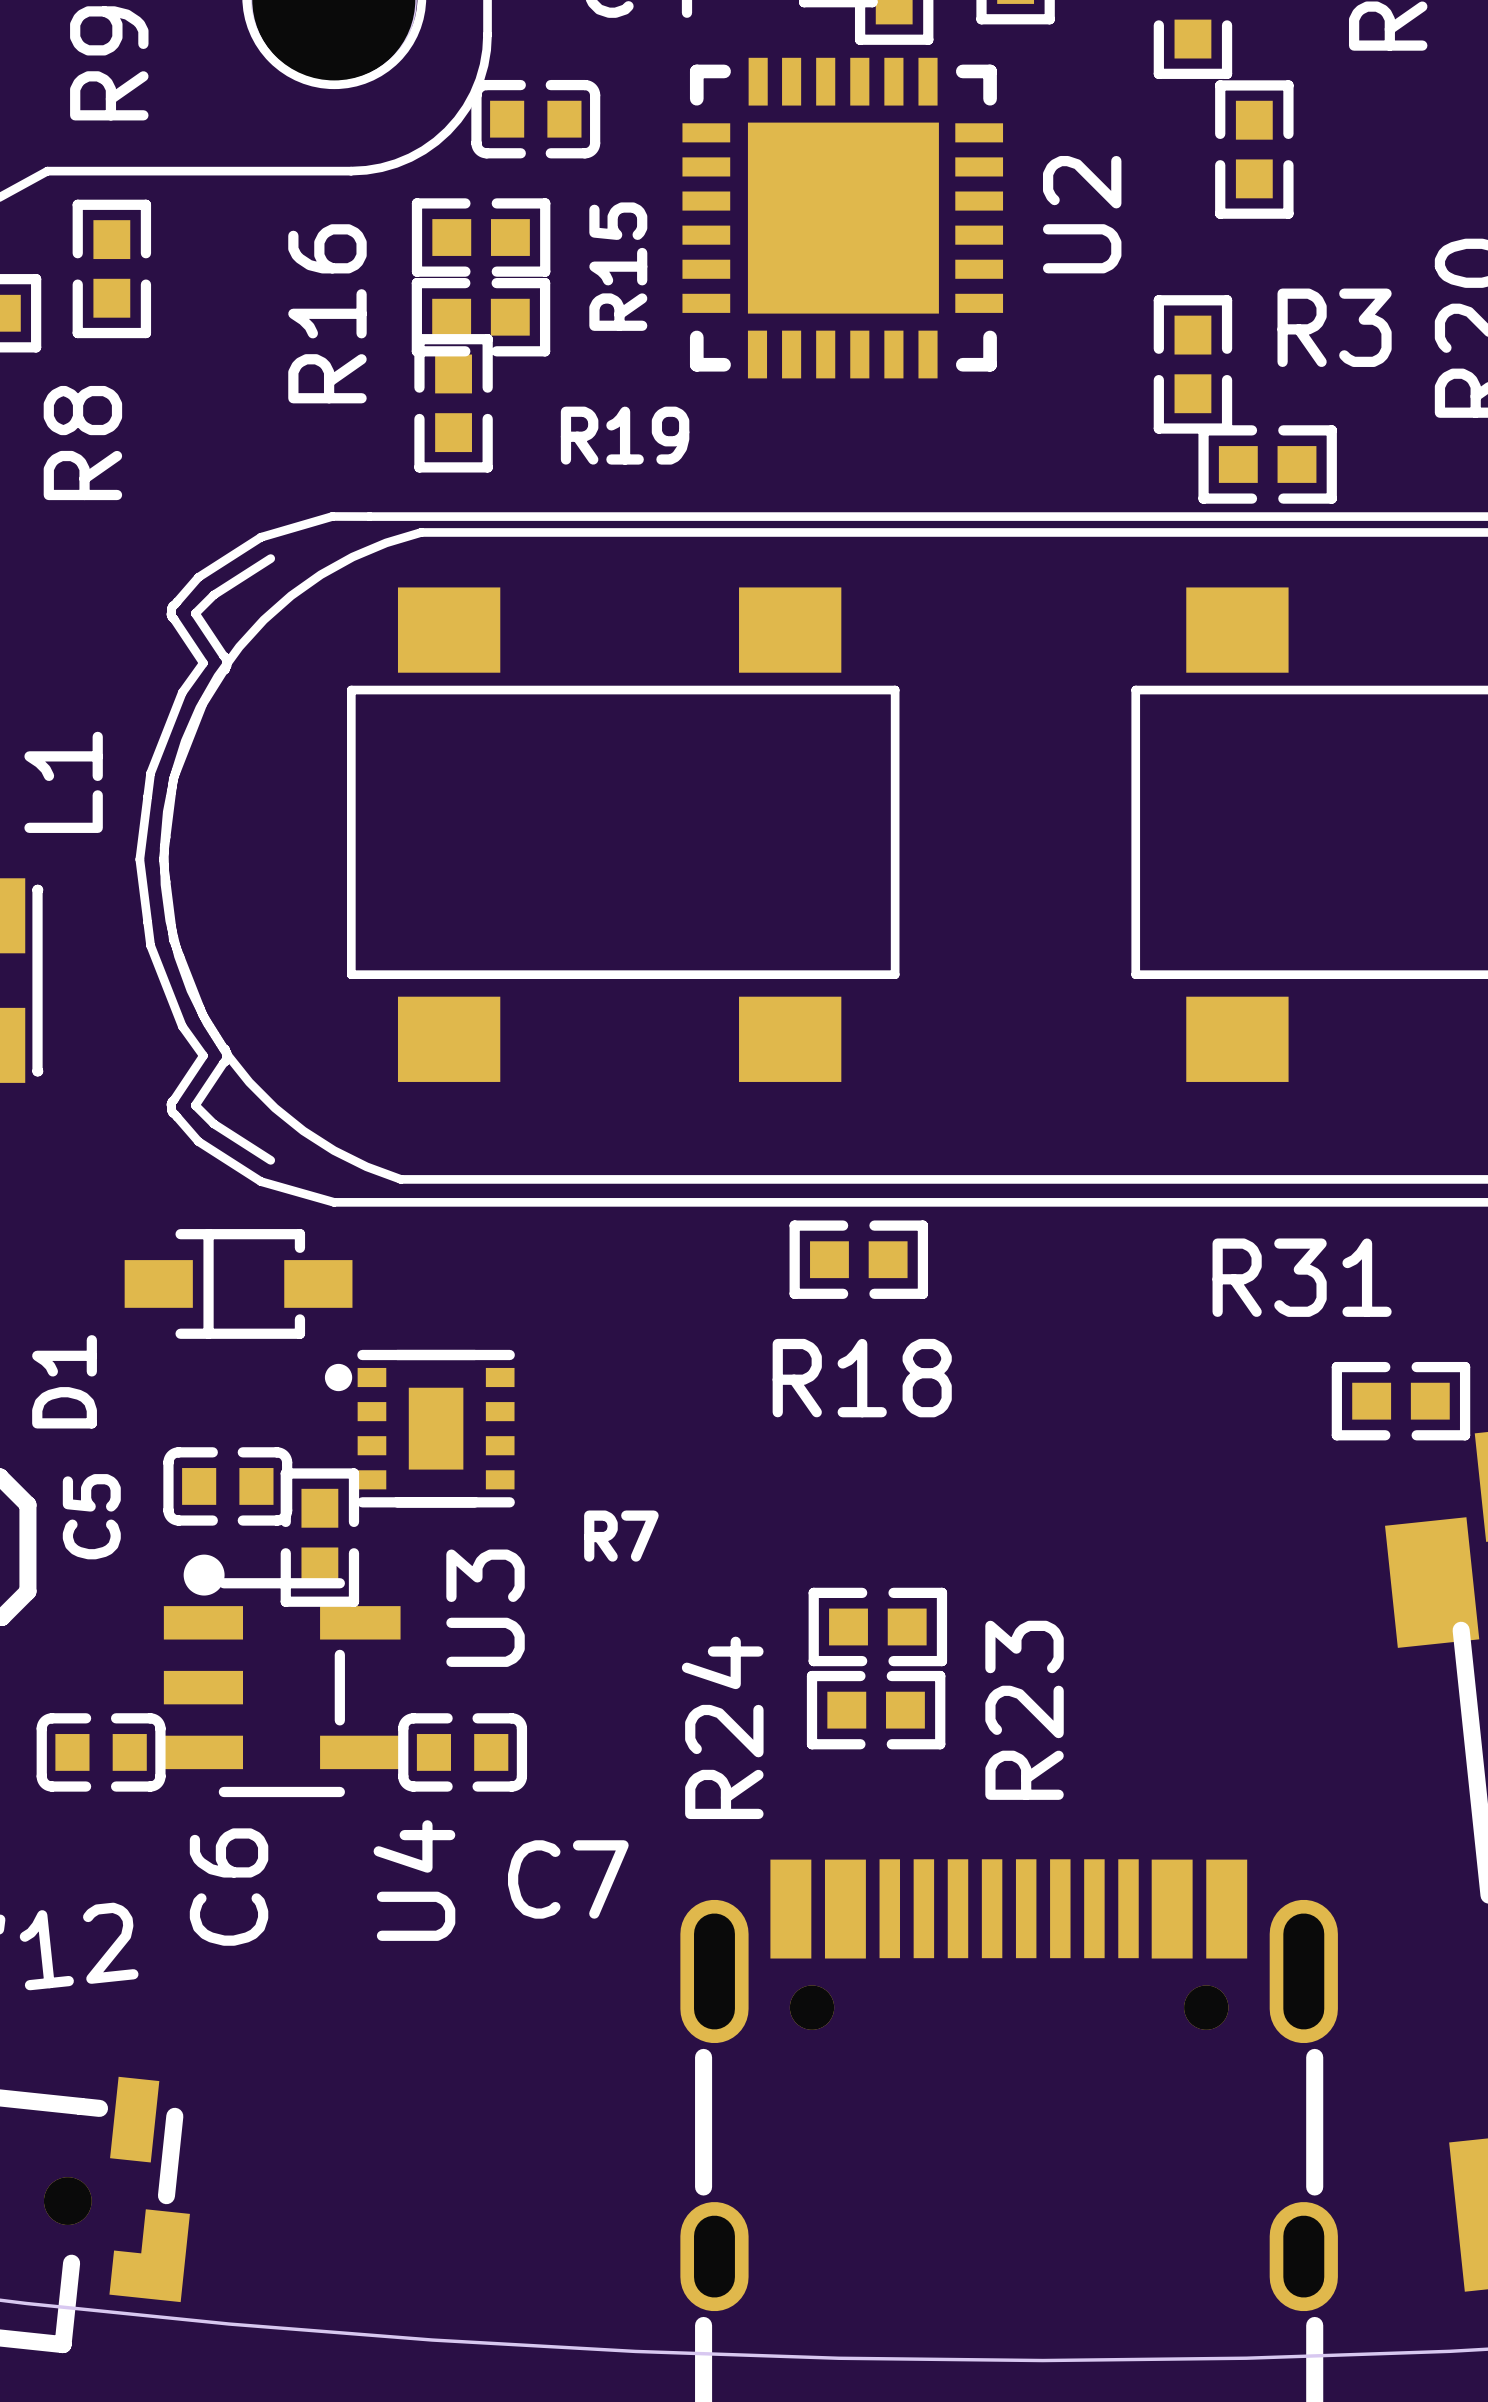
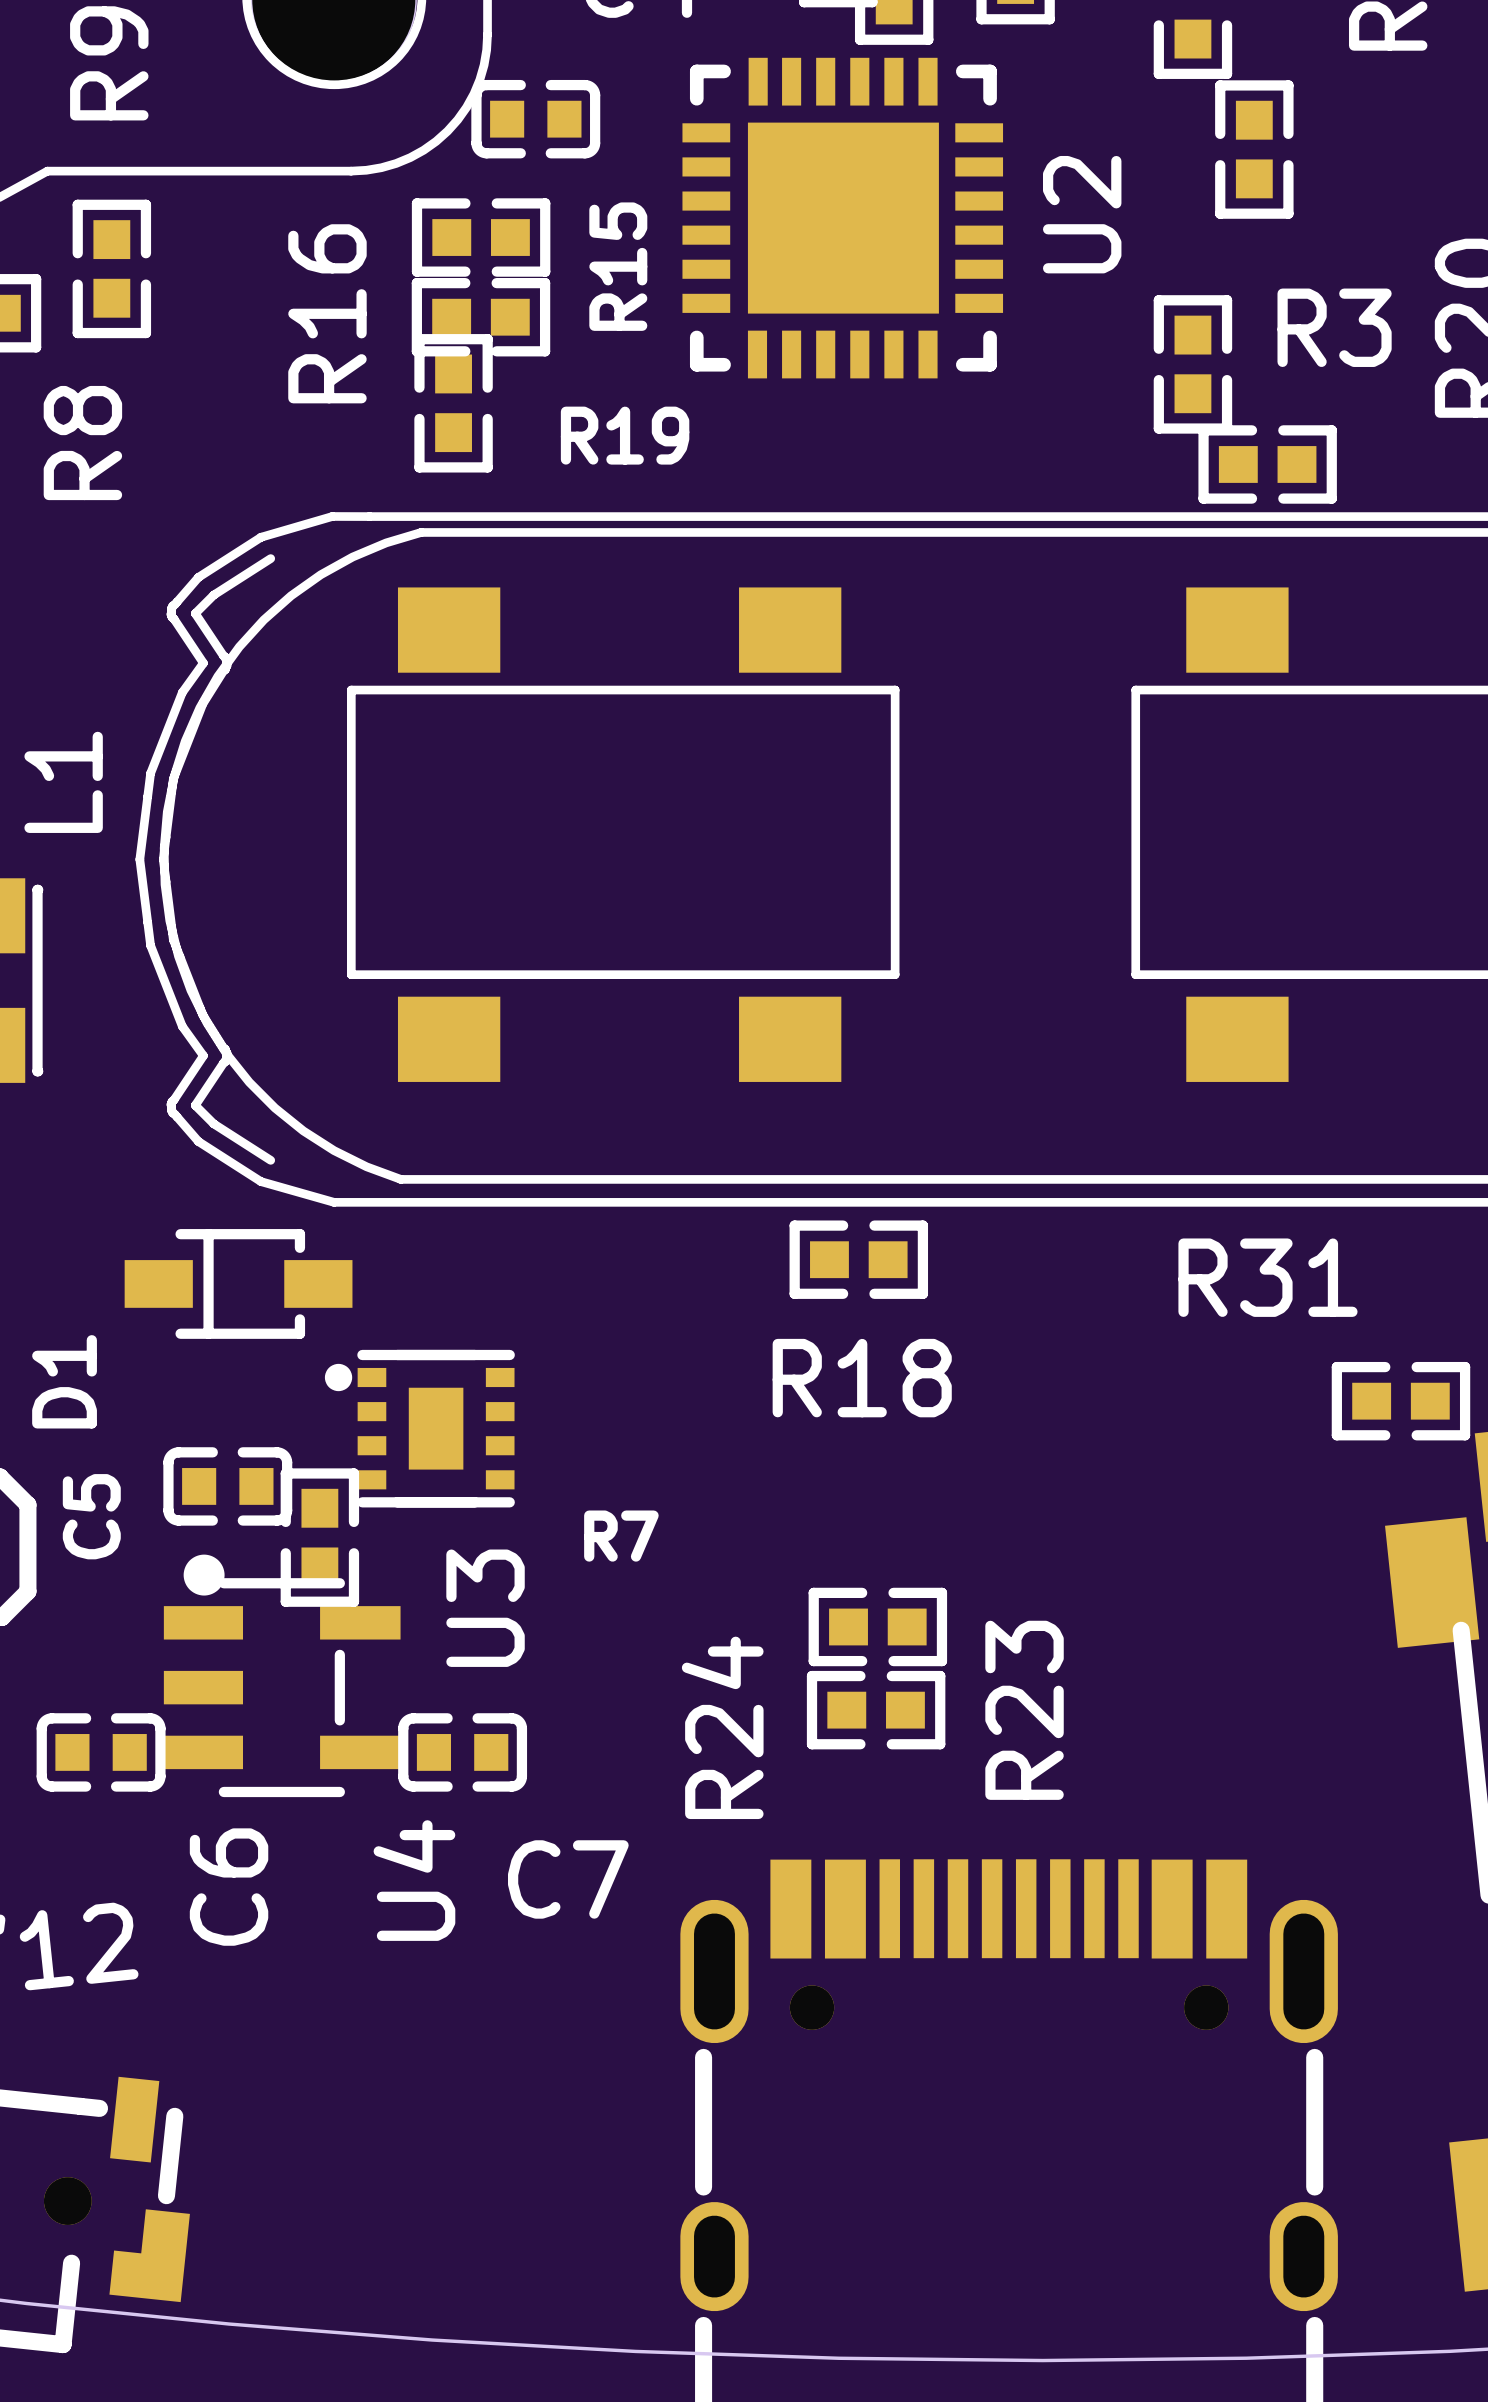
R31 name position: R31 (1302, 1277) -> R31 (1267, 1277)

